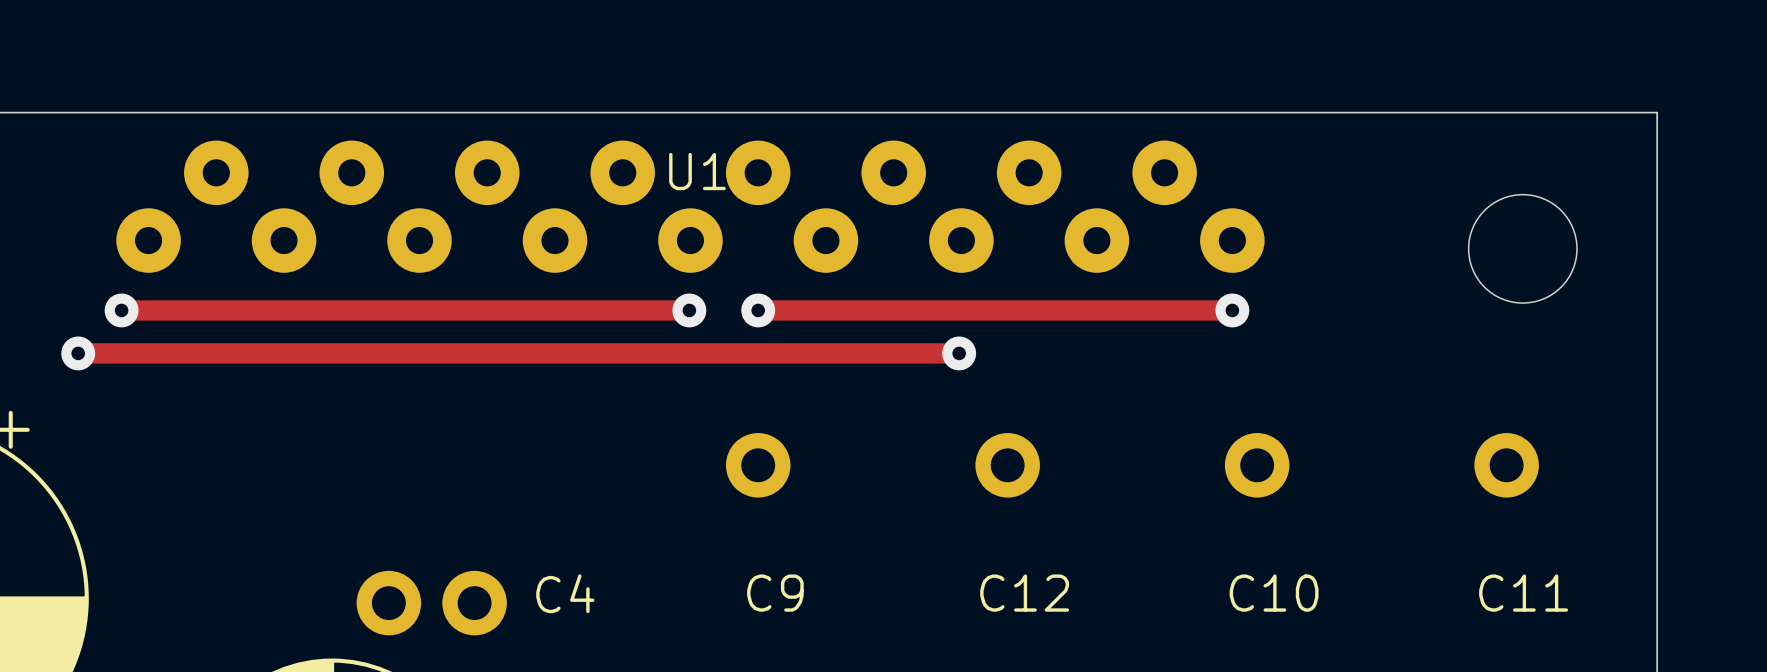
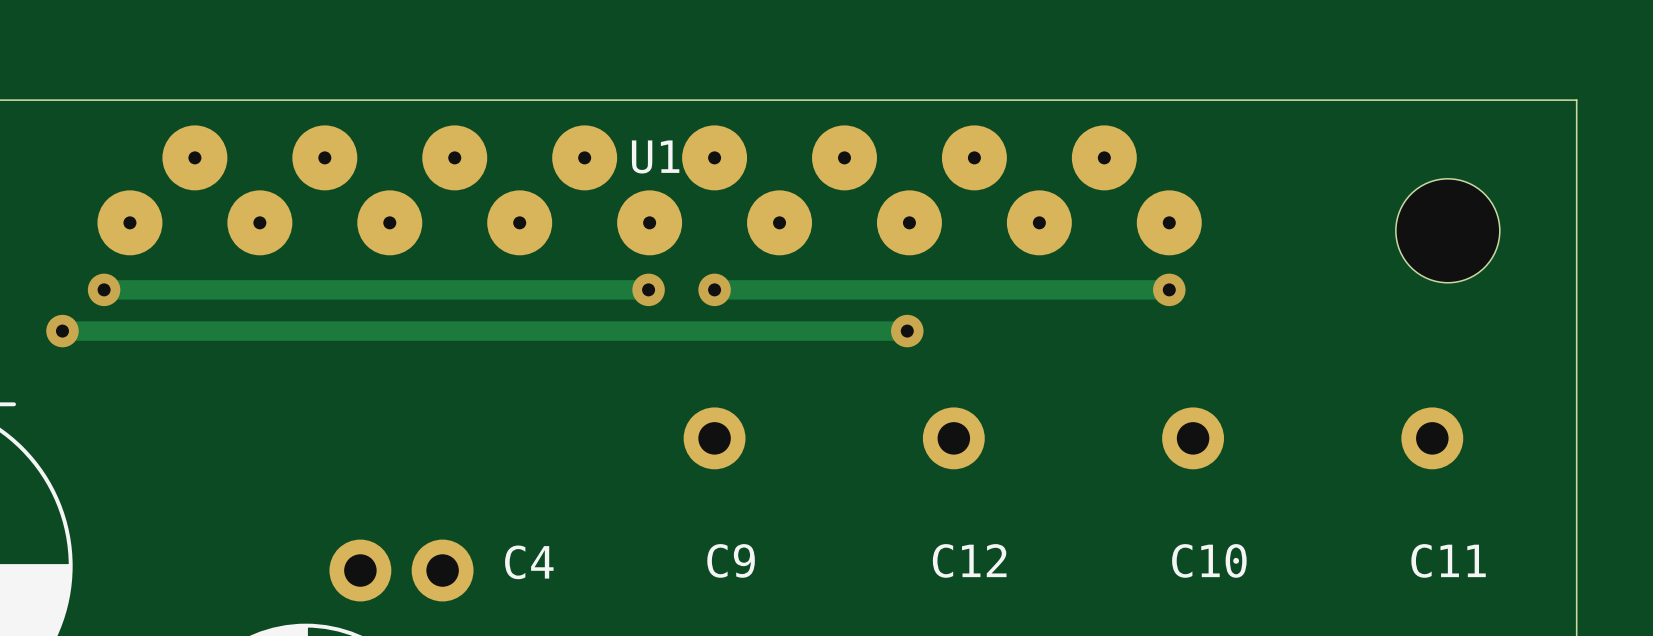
U1 footprint: [116, 140, 1265, 273] -> [97, 125, 1202, 256]

